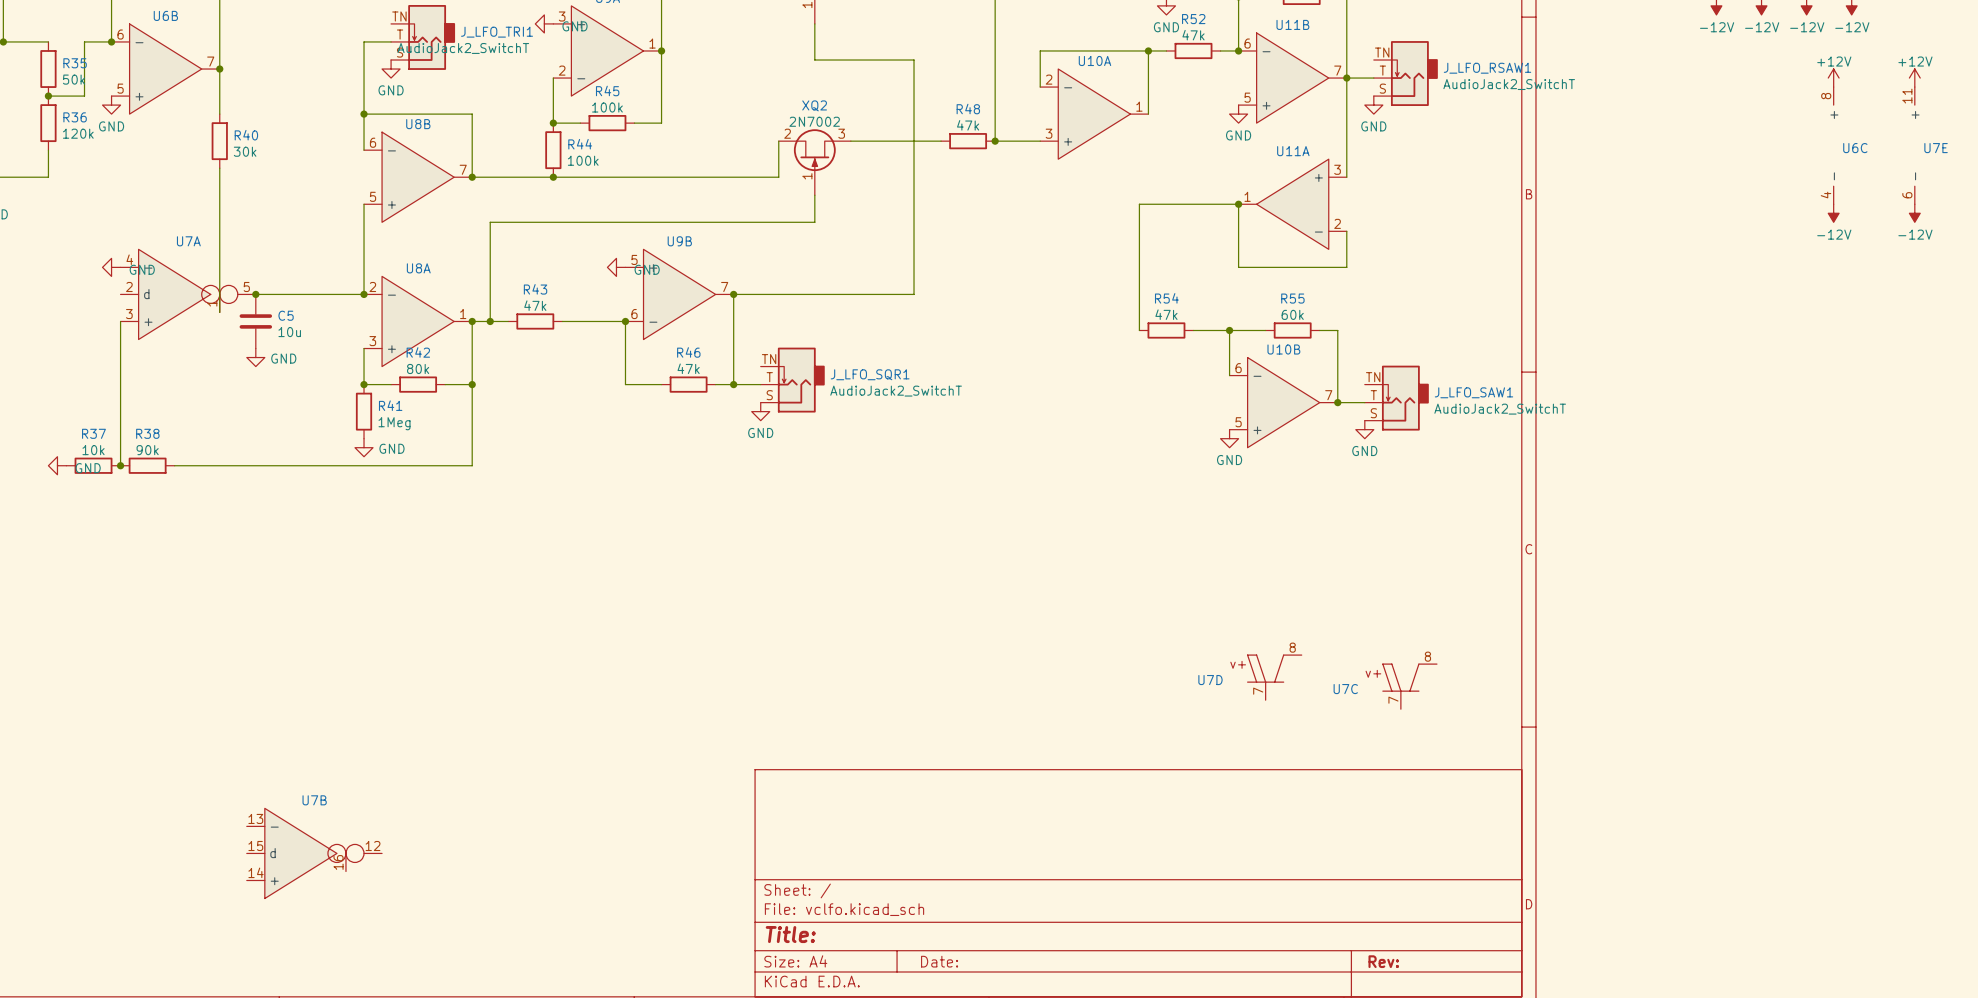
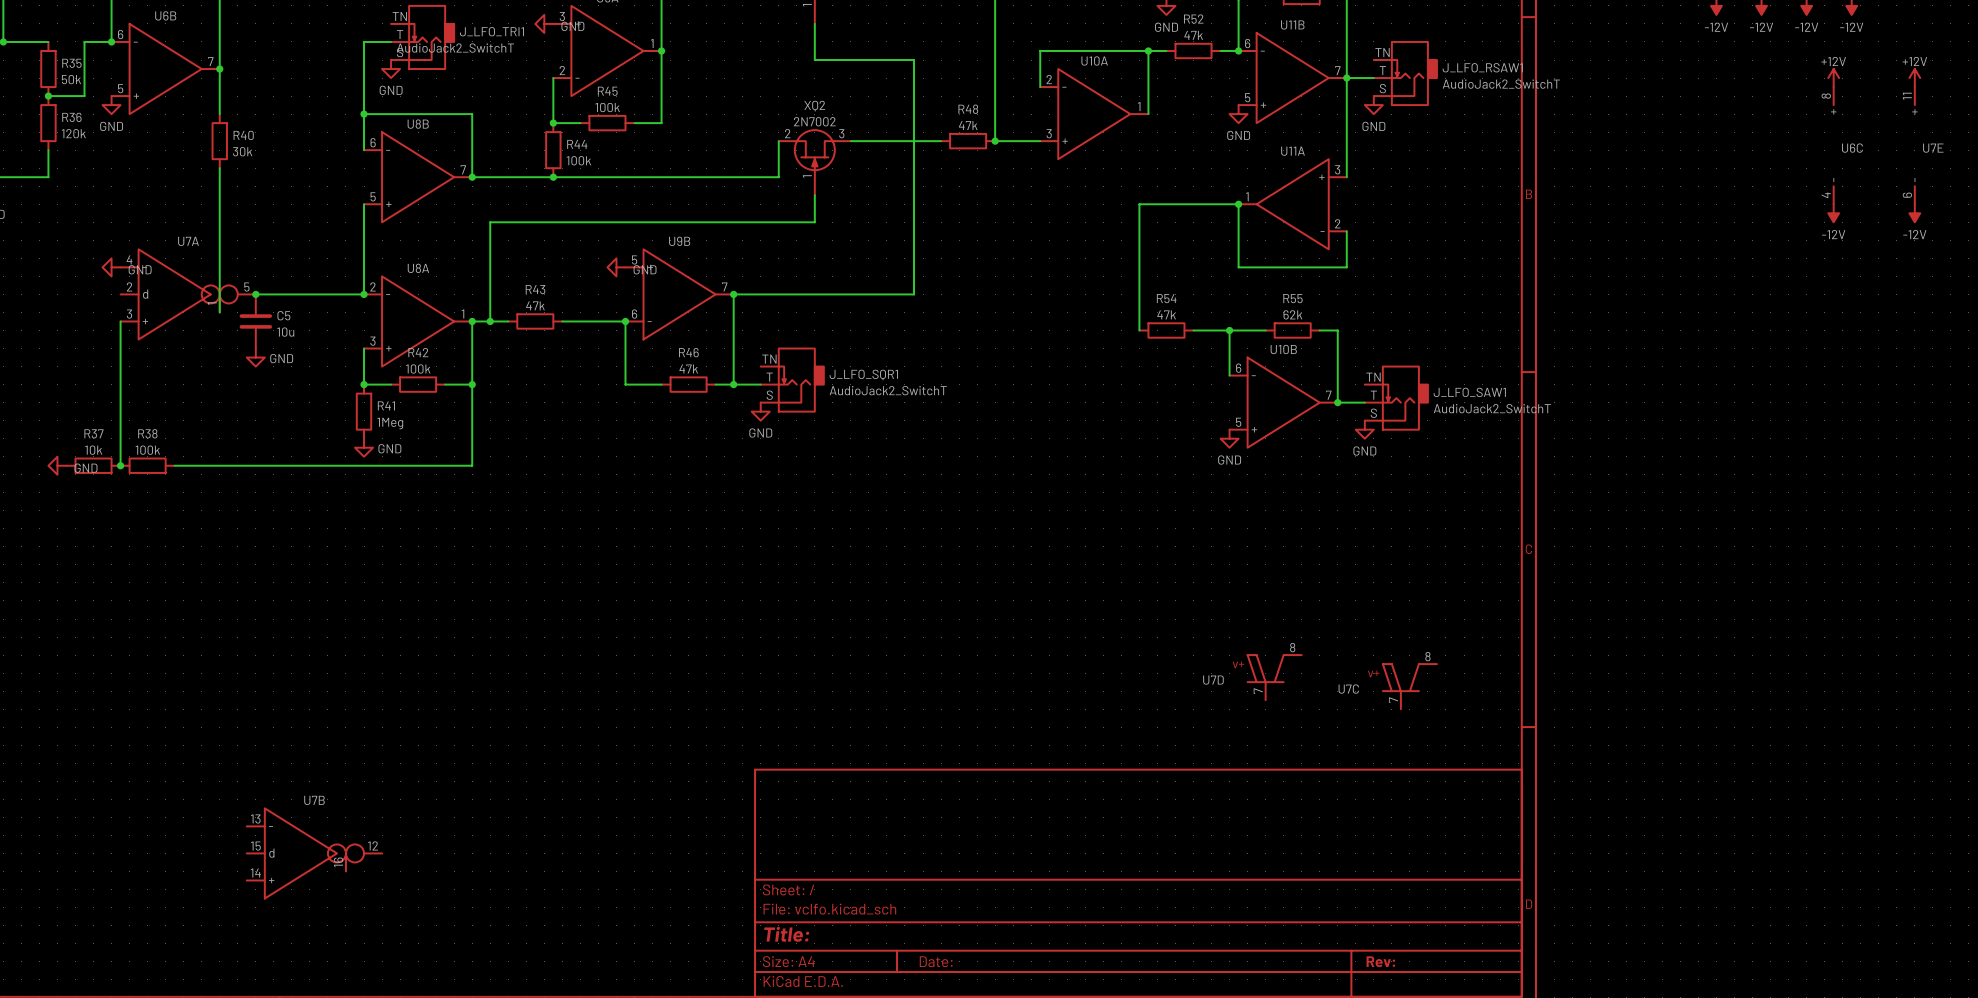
R55 value: 60k (1292, 314) -> 62k (1292, 314)
R42 value: 80k (418, 368) -> 100k (418, 368)
R38 value: 90k (147, 450) -> 100k (147, 450)

